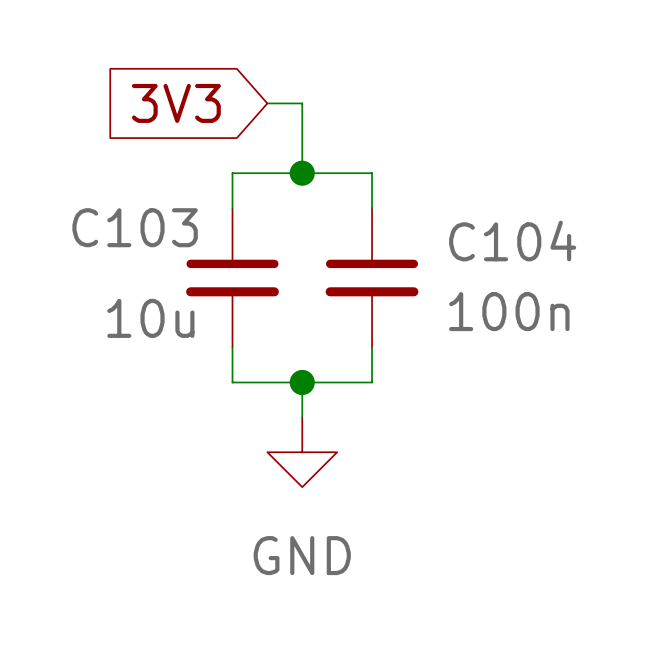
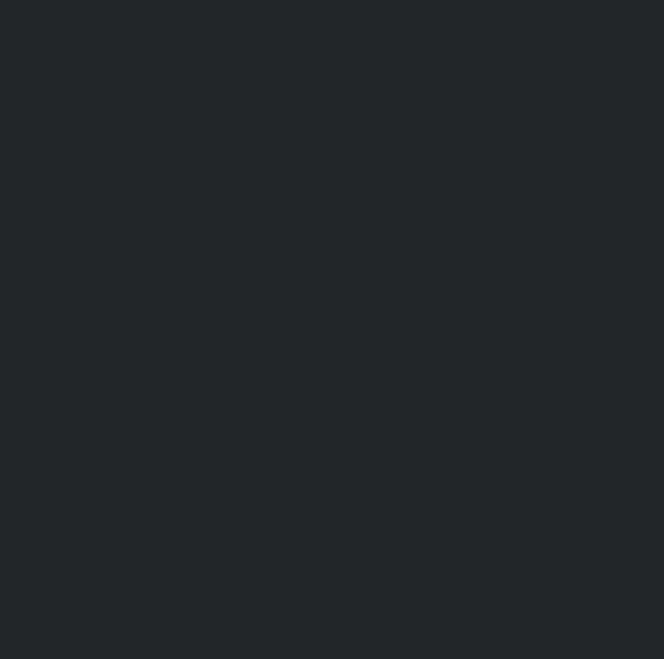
global label: 3V3 (176, 103) -> none
wire: (267, 103) (302, 103) (302, 173) -> none
junction: (302, 173) -> none
wire: (232, 208) (232, 173) (372, 173) (372, 208) -> none
C103: 10u (232, 277) -> none
C104: 100n (372, 277) -> none
wire: (232, 347) (232, 382) (372, 382) (372, 347) -> none
wire: (302, 382) (302, 417) -> none
junction: (302, 382) -> none
power symbol: GND (302, 452) -> none

